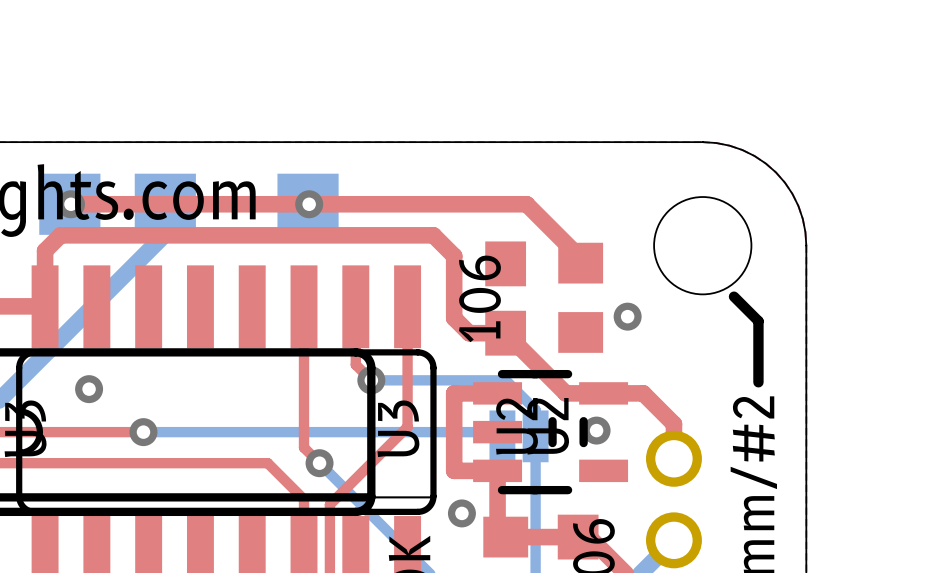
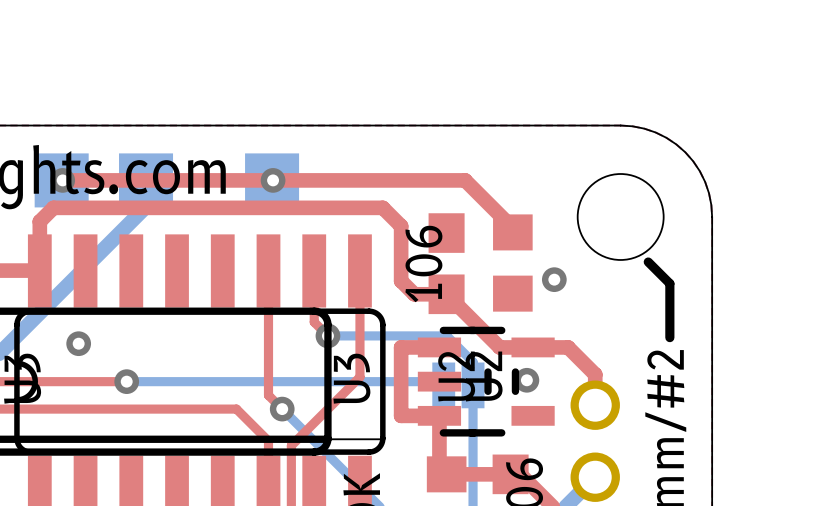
via: (461, 513) -> none

